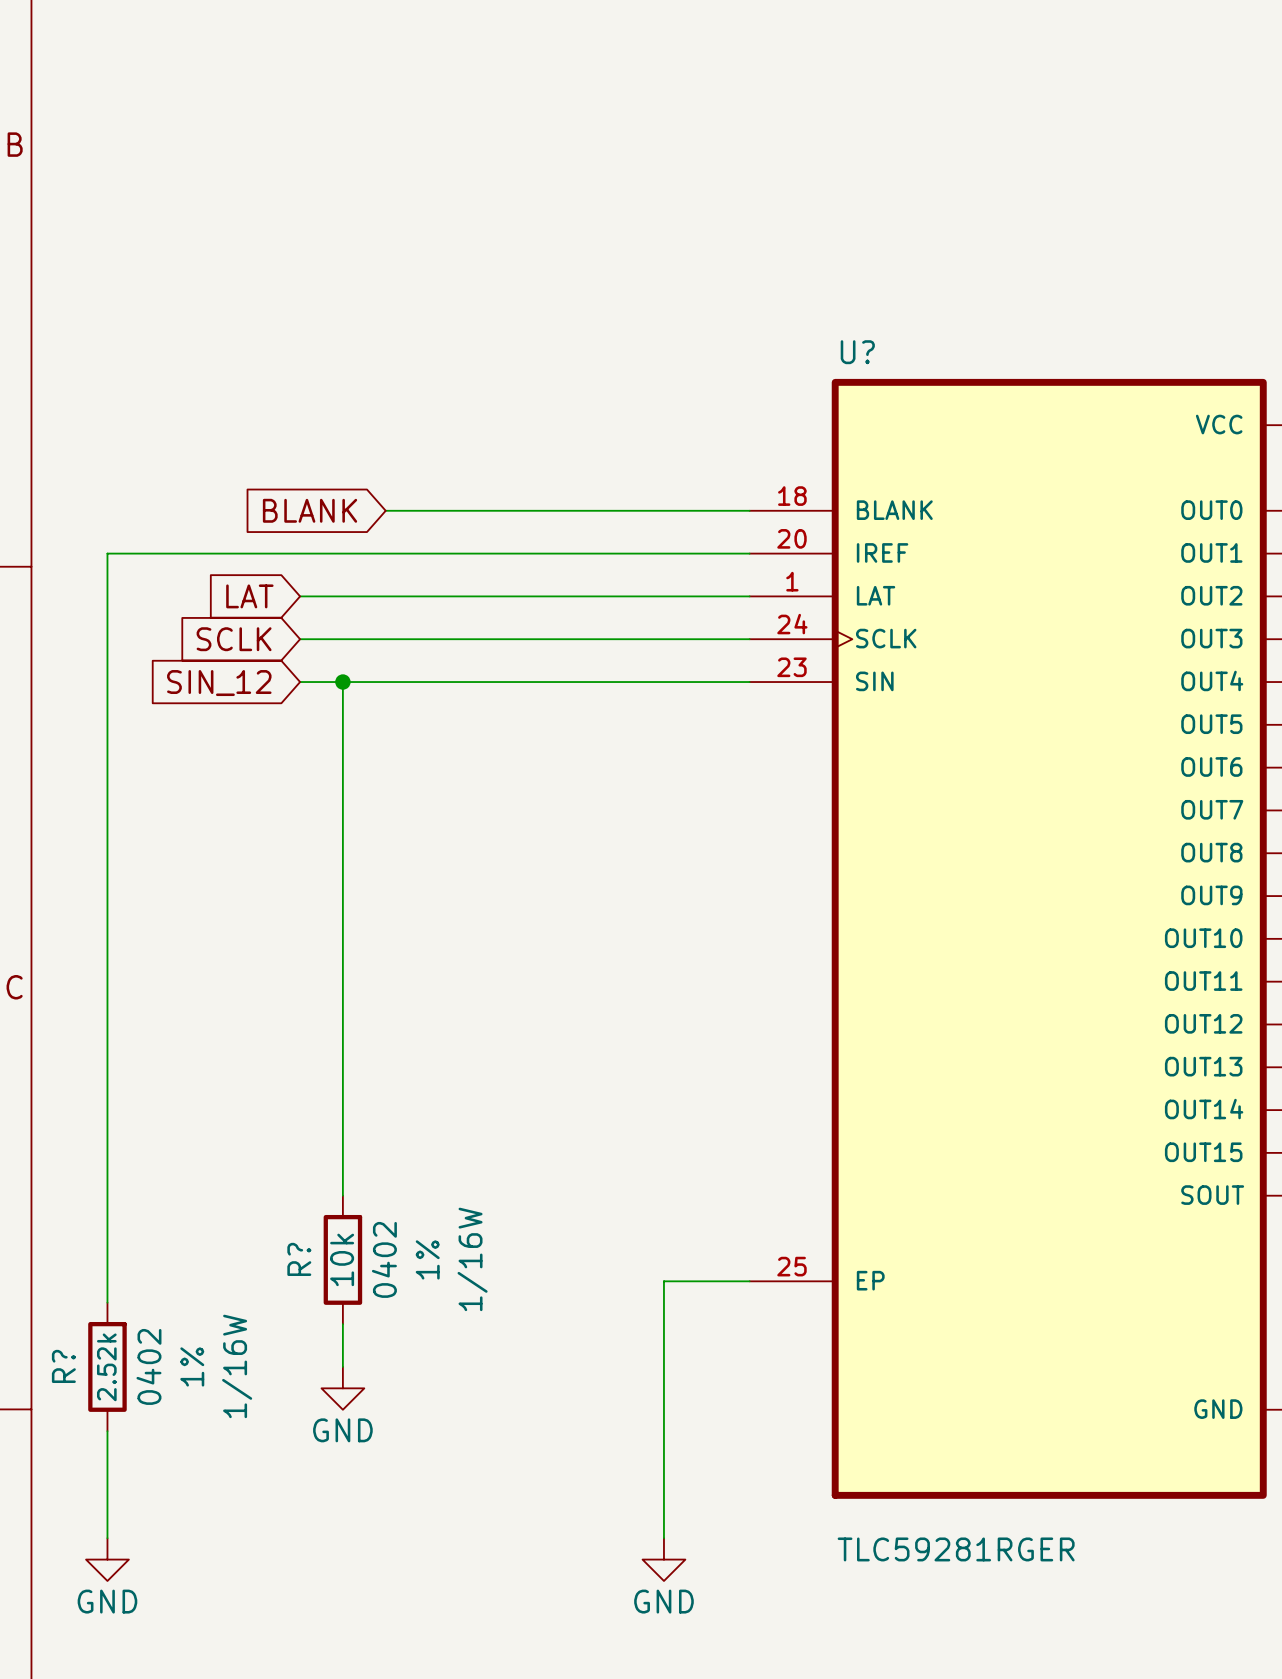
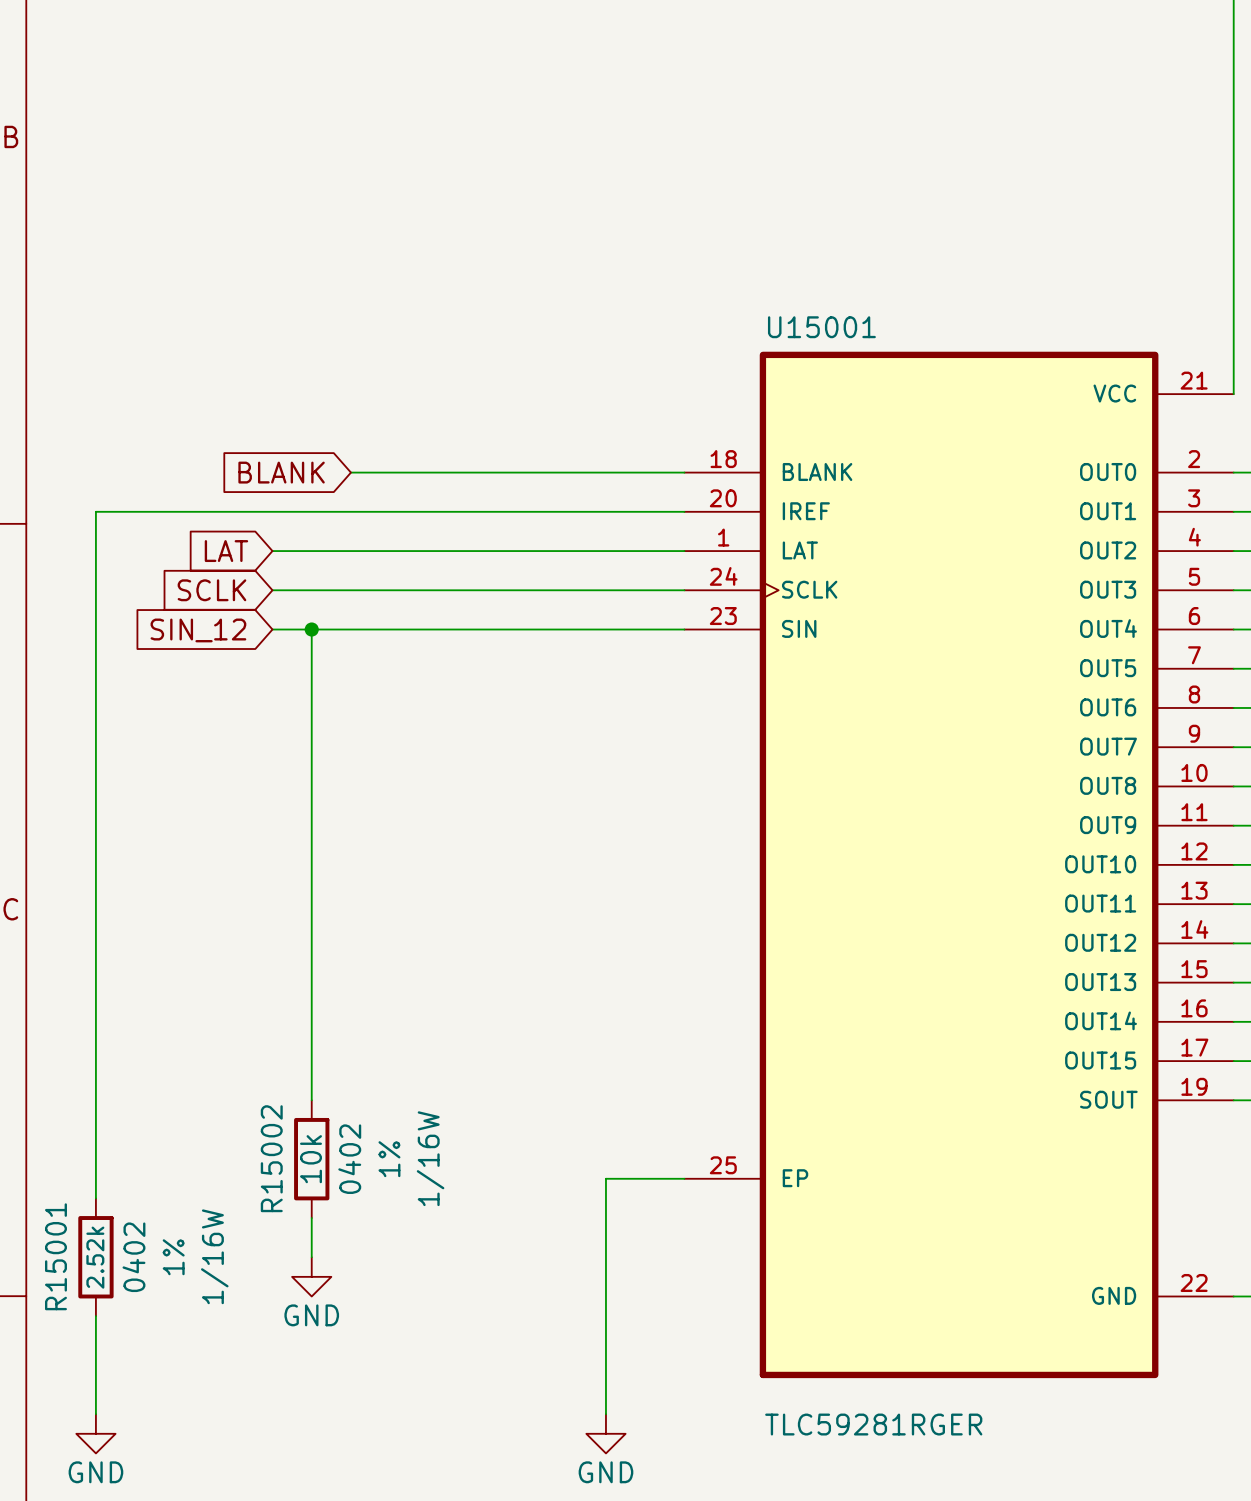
U? name: U? (857, 352) -> U15001 (821, 327)
R? name: R? (299, 1259) -> R15002 (271, 1158)
R? name: R? (63, 1366) -> R15001 (55, 1256)

